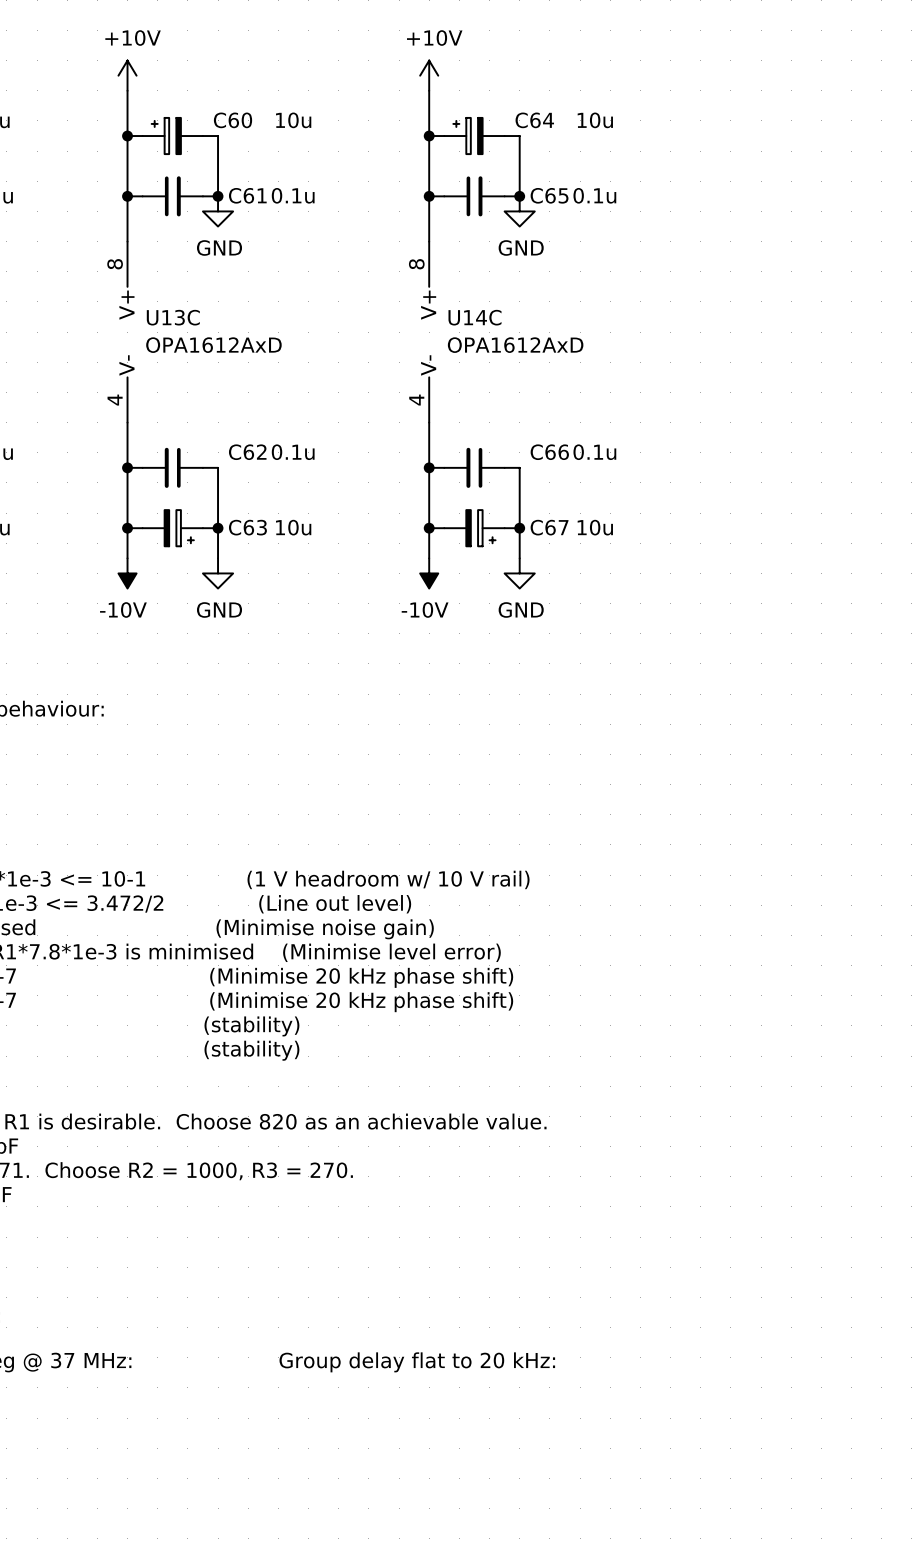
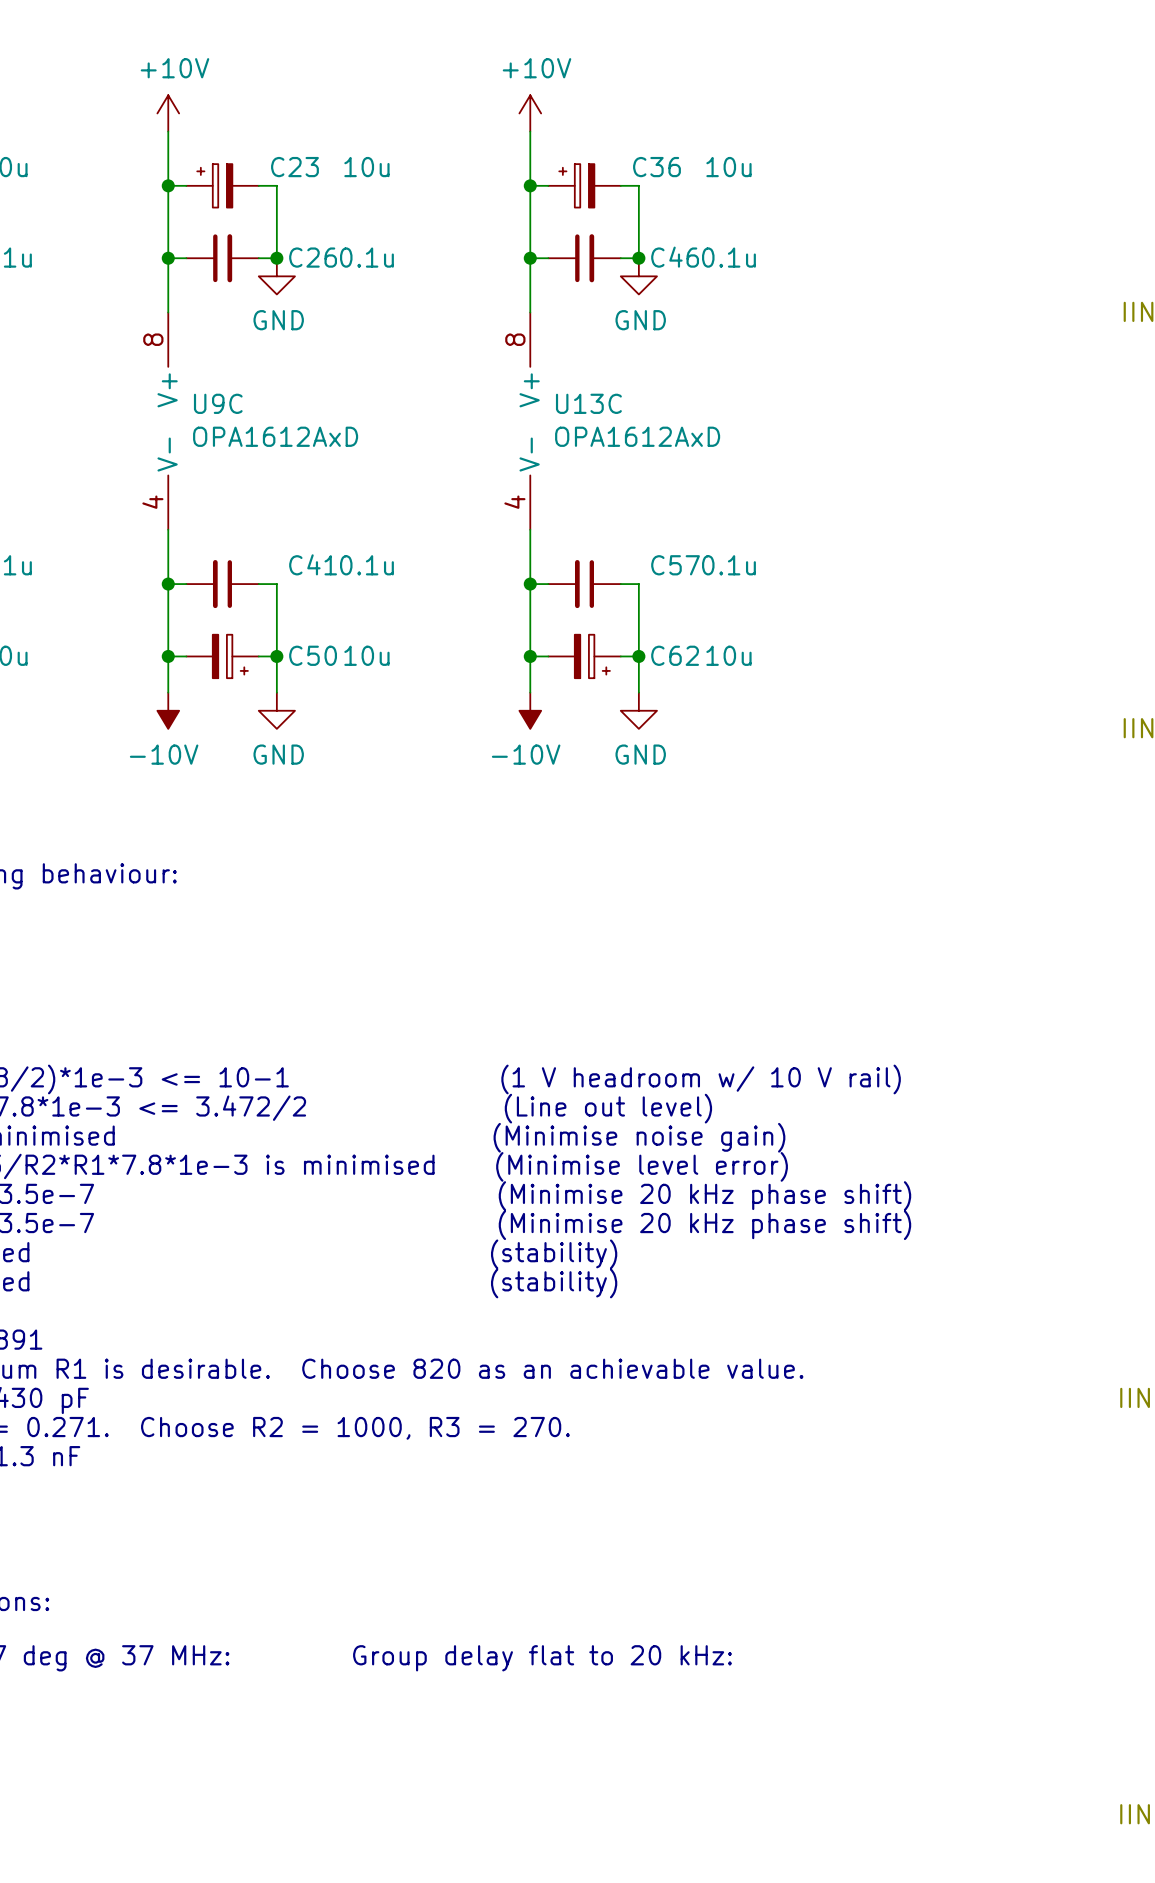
C60 name: C60 (233, 120) -> C23 (294, 167)
C64 name: C64 (534, 120) -> C36 (656, 167)
C61 name: C61 (247, 195) -> C26 (313, 257)
C65 name: C65 (549, 195) -> C46 (675, 257)
U13C name: U13C (173, 317) -> U9C (218, 403)
U14C name: U14C (474, 317) -> U13C (588, 403)
C62 name: C62 (247, 452) -> C41 (313, 564)
C66 name: C66 (549, 452) -> C57 (675, 565)
C63 name: C63 (247, 527) -> C50 (313, 655)
C67 name: C67 (549, 527) -> C62 (675, 655)

